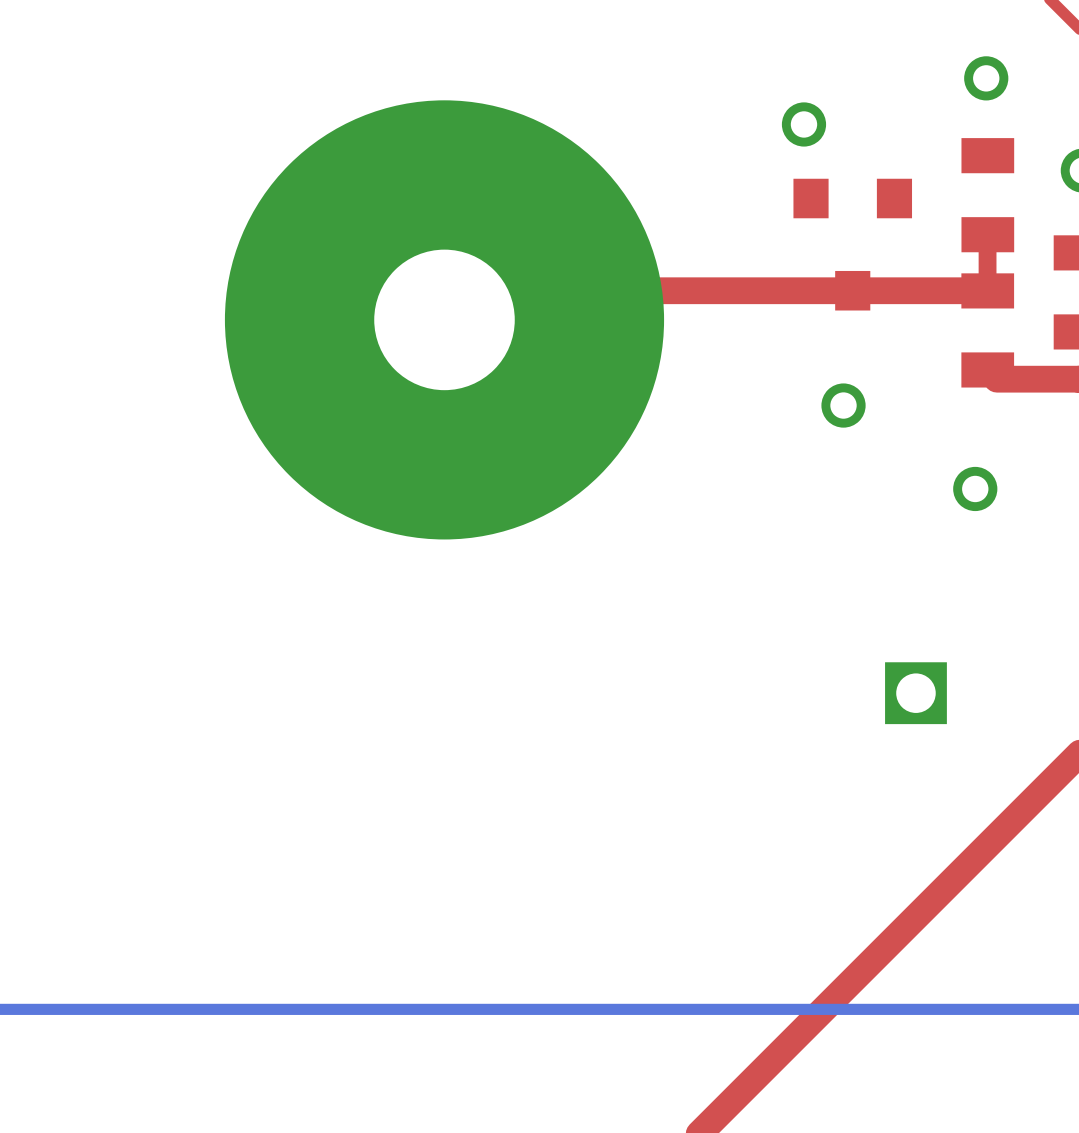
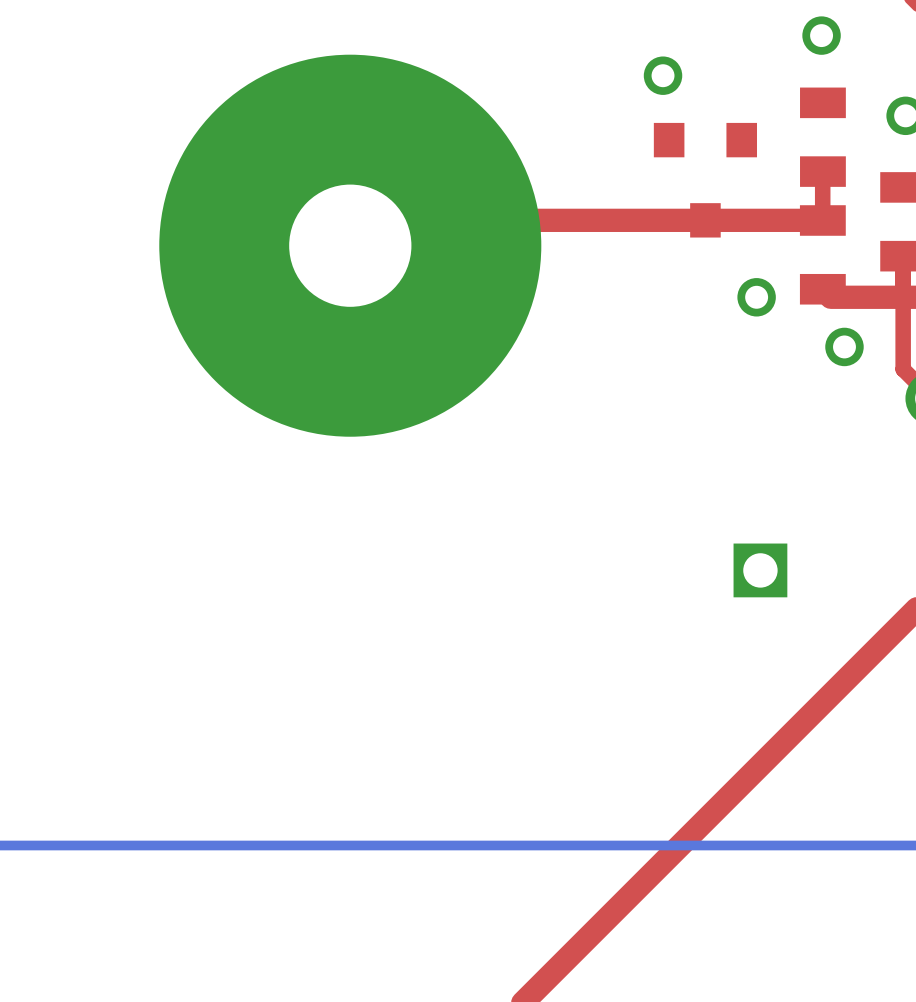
via: none -> (756, 297)
via: (843, 405) -> none
via: none -> (844, 346)
via: (975, 488) -> none

